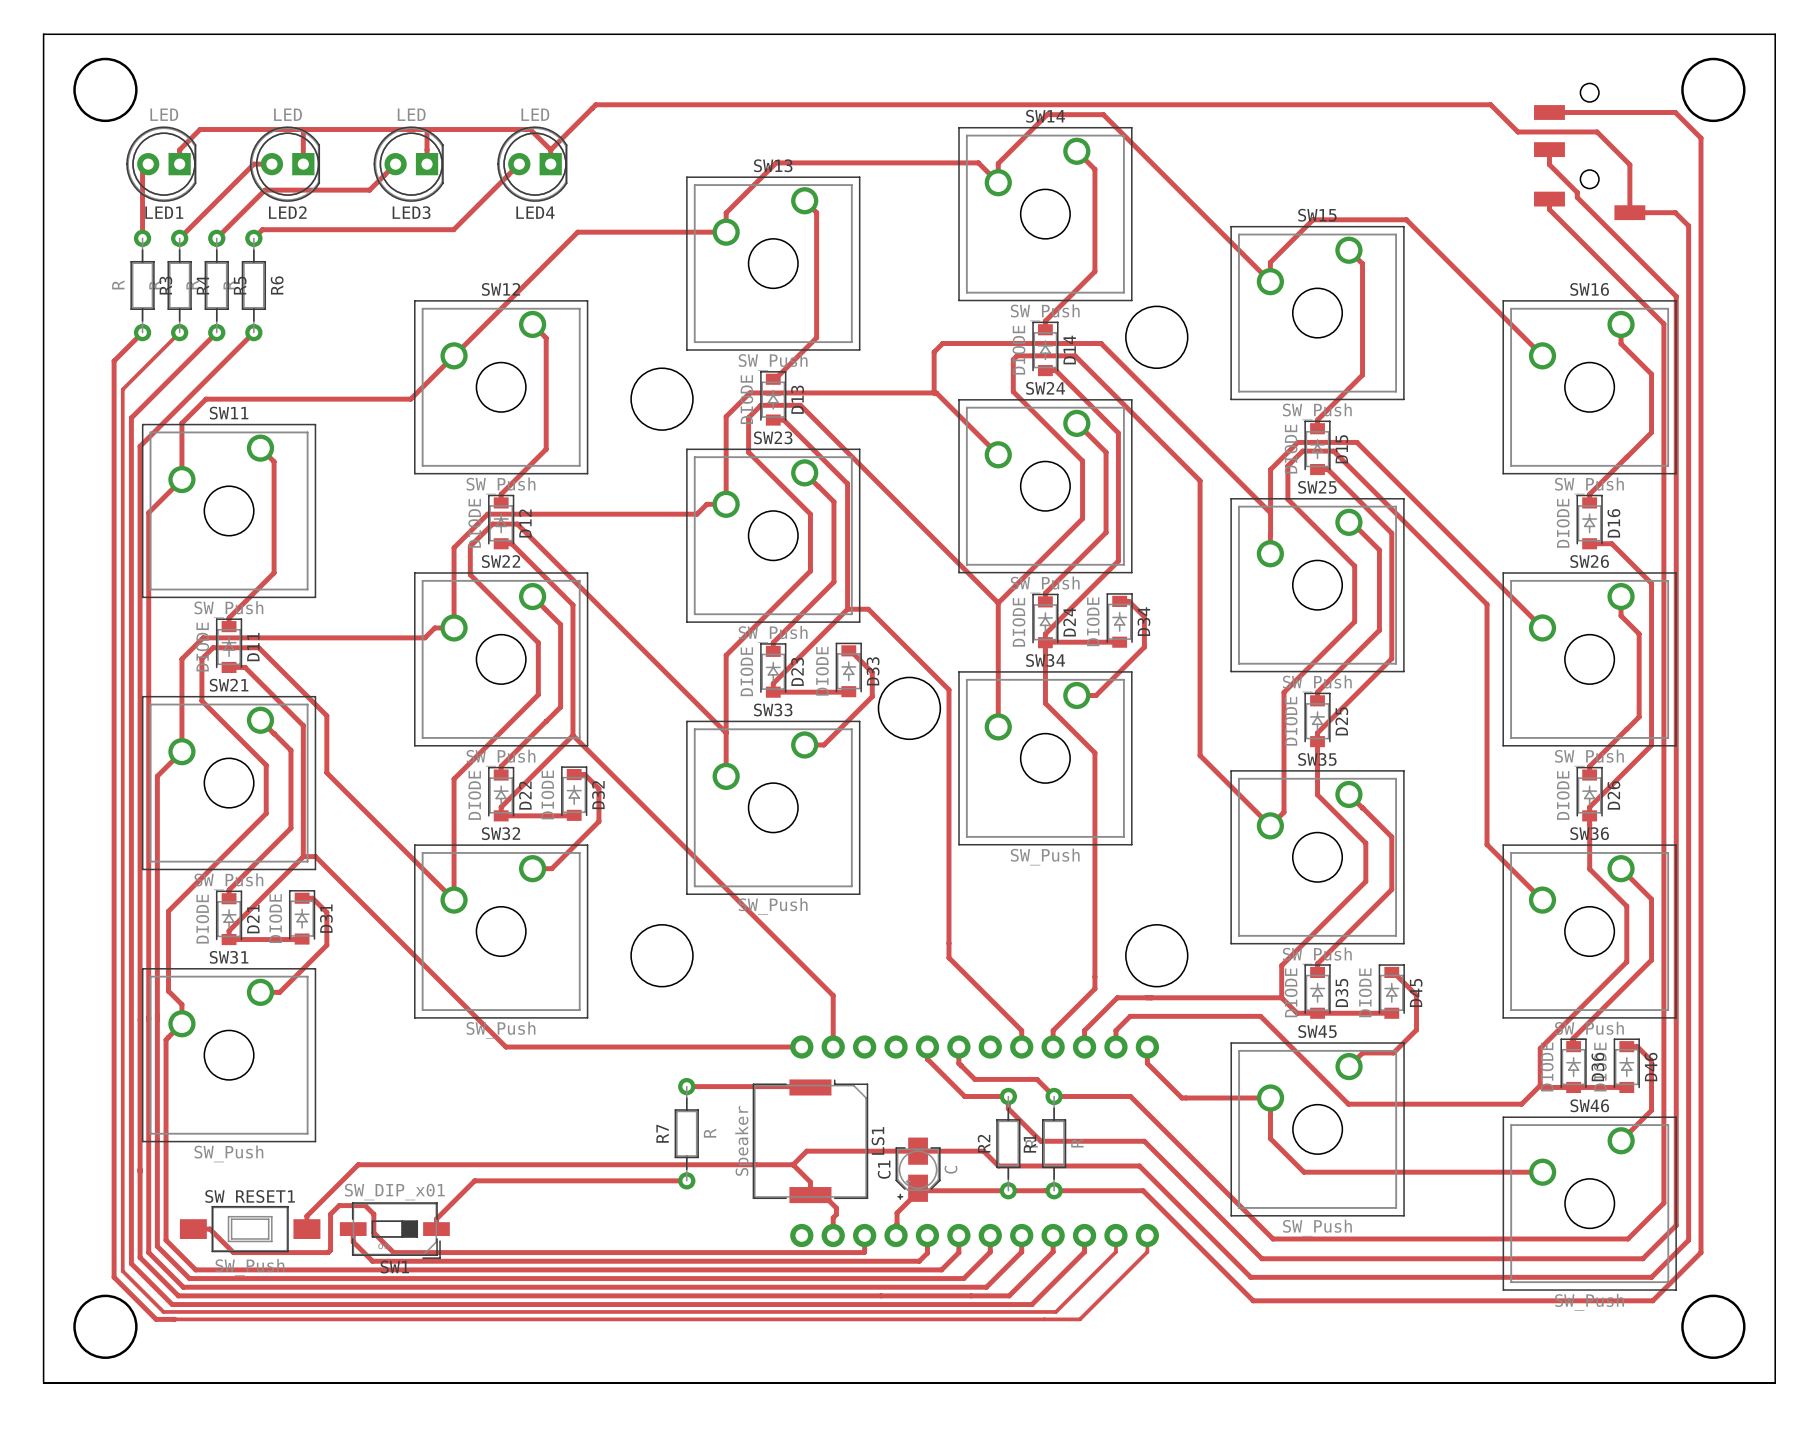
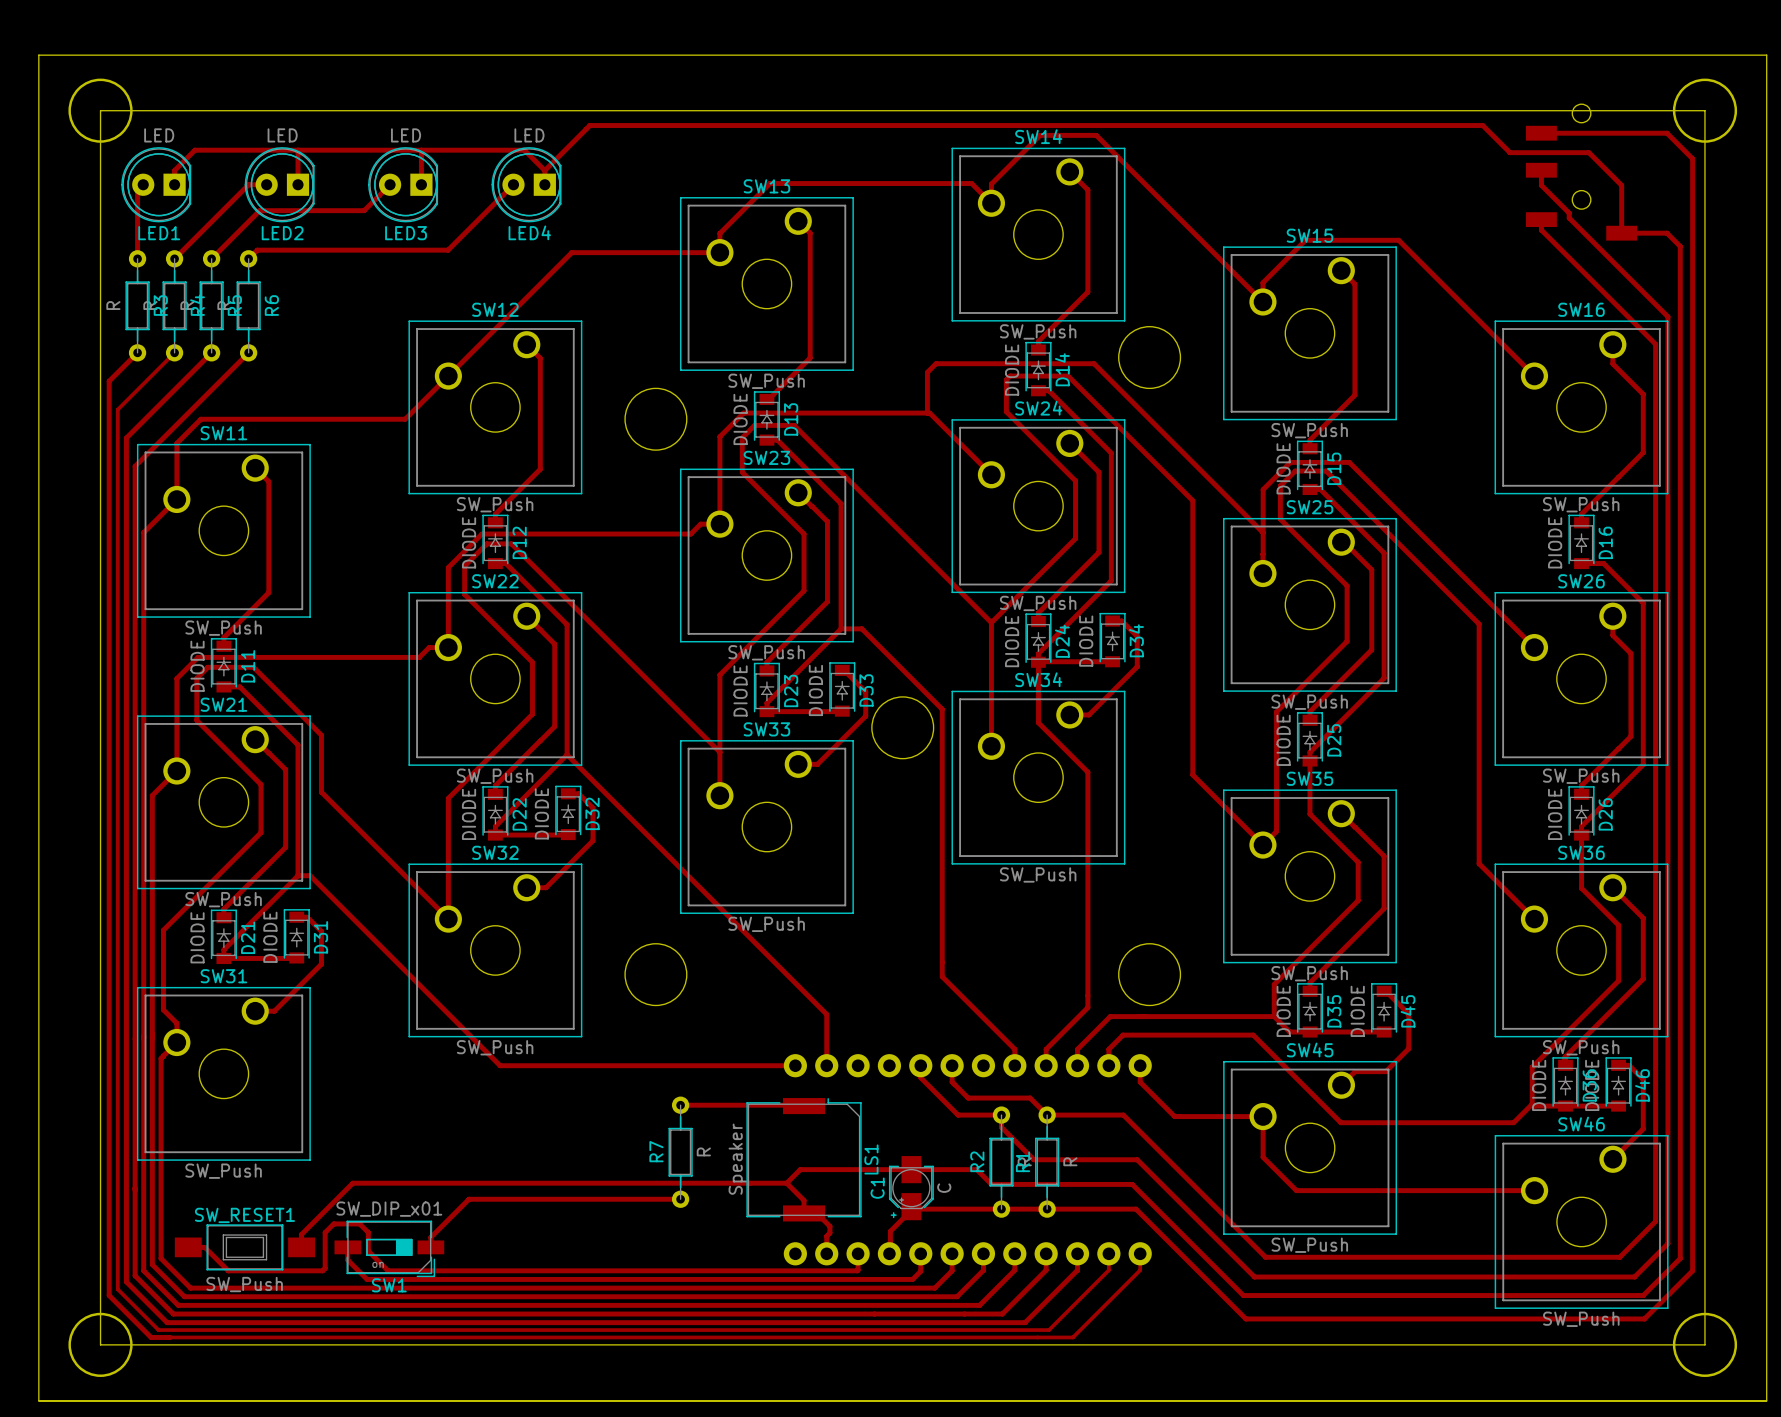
board edge: none -> (100, 110) (100, 1344) (1704, 1344) (1704, 110) (100, 110)

